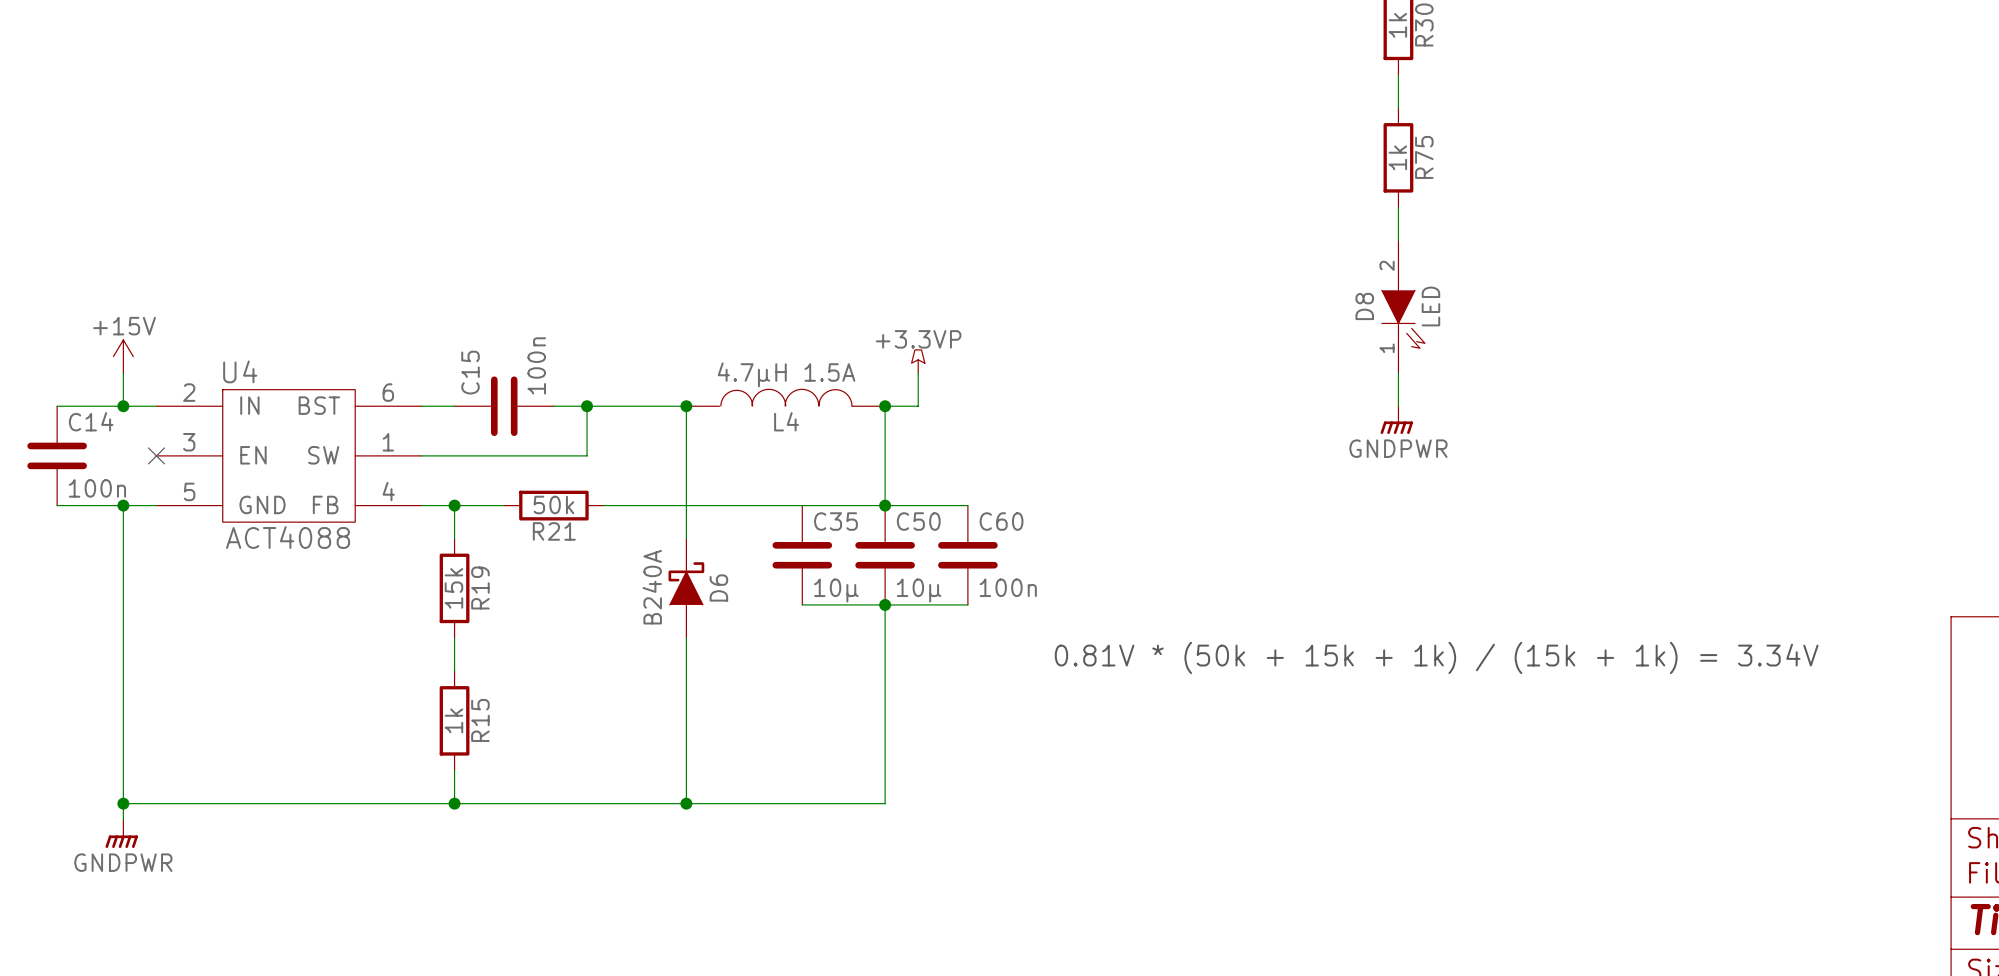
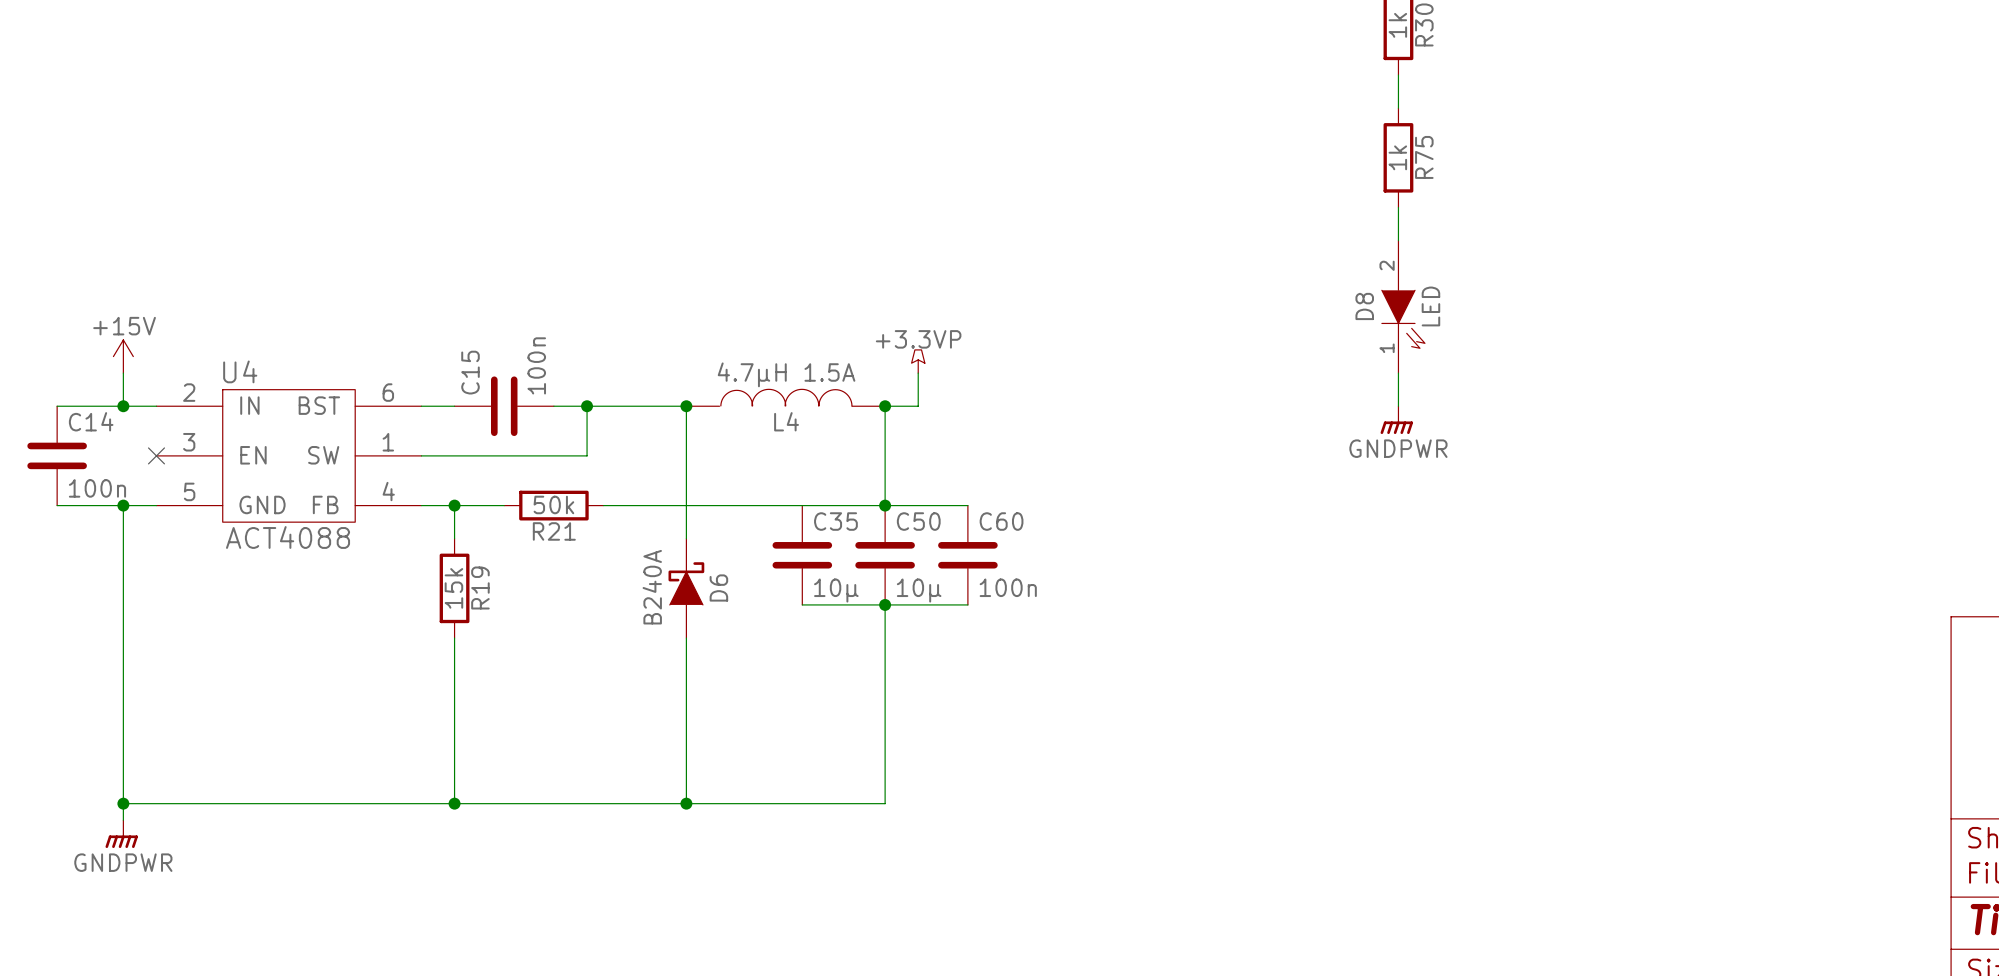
text: 0.81V * (50k + 15k + 1k) / (15k + 1k) = 3.34V (1436, 657) -> none
wire: none -> (454, 671) (454, 770)
R15: 1k (454, 720) -> none

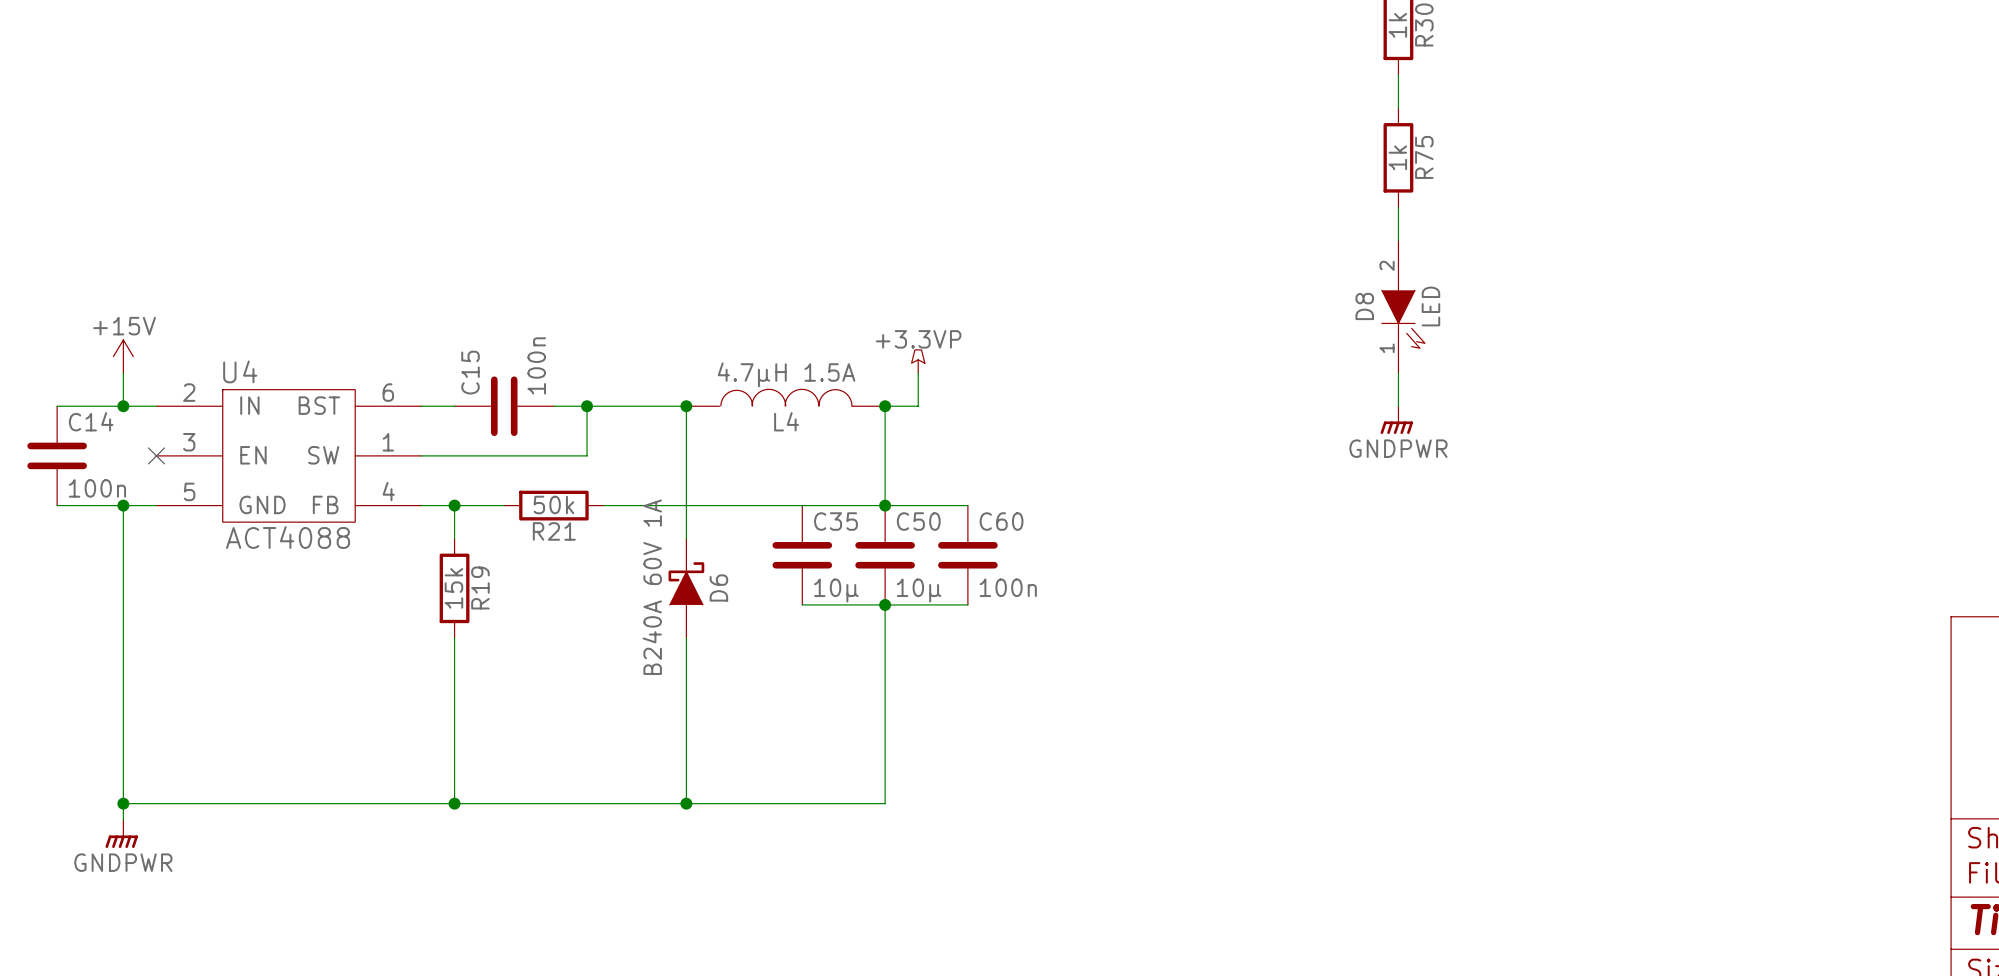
D6 value: B240A (652, 587) -> B240A 60V 1A (652, 587)

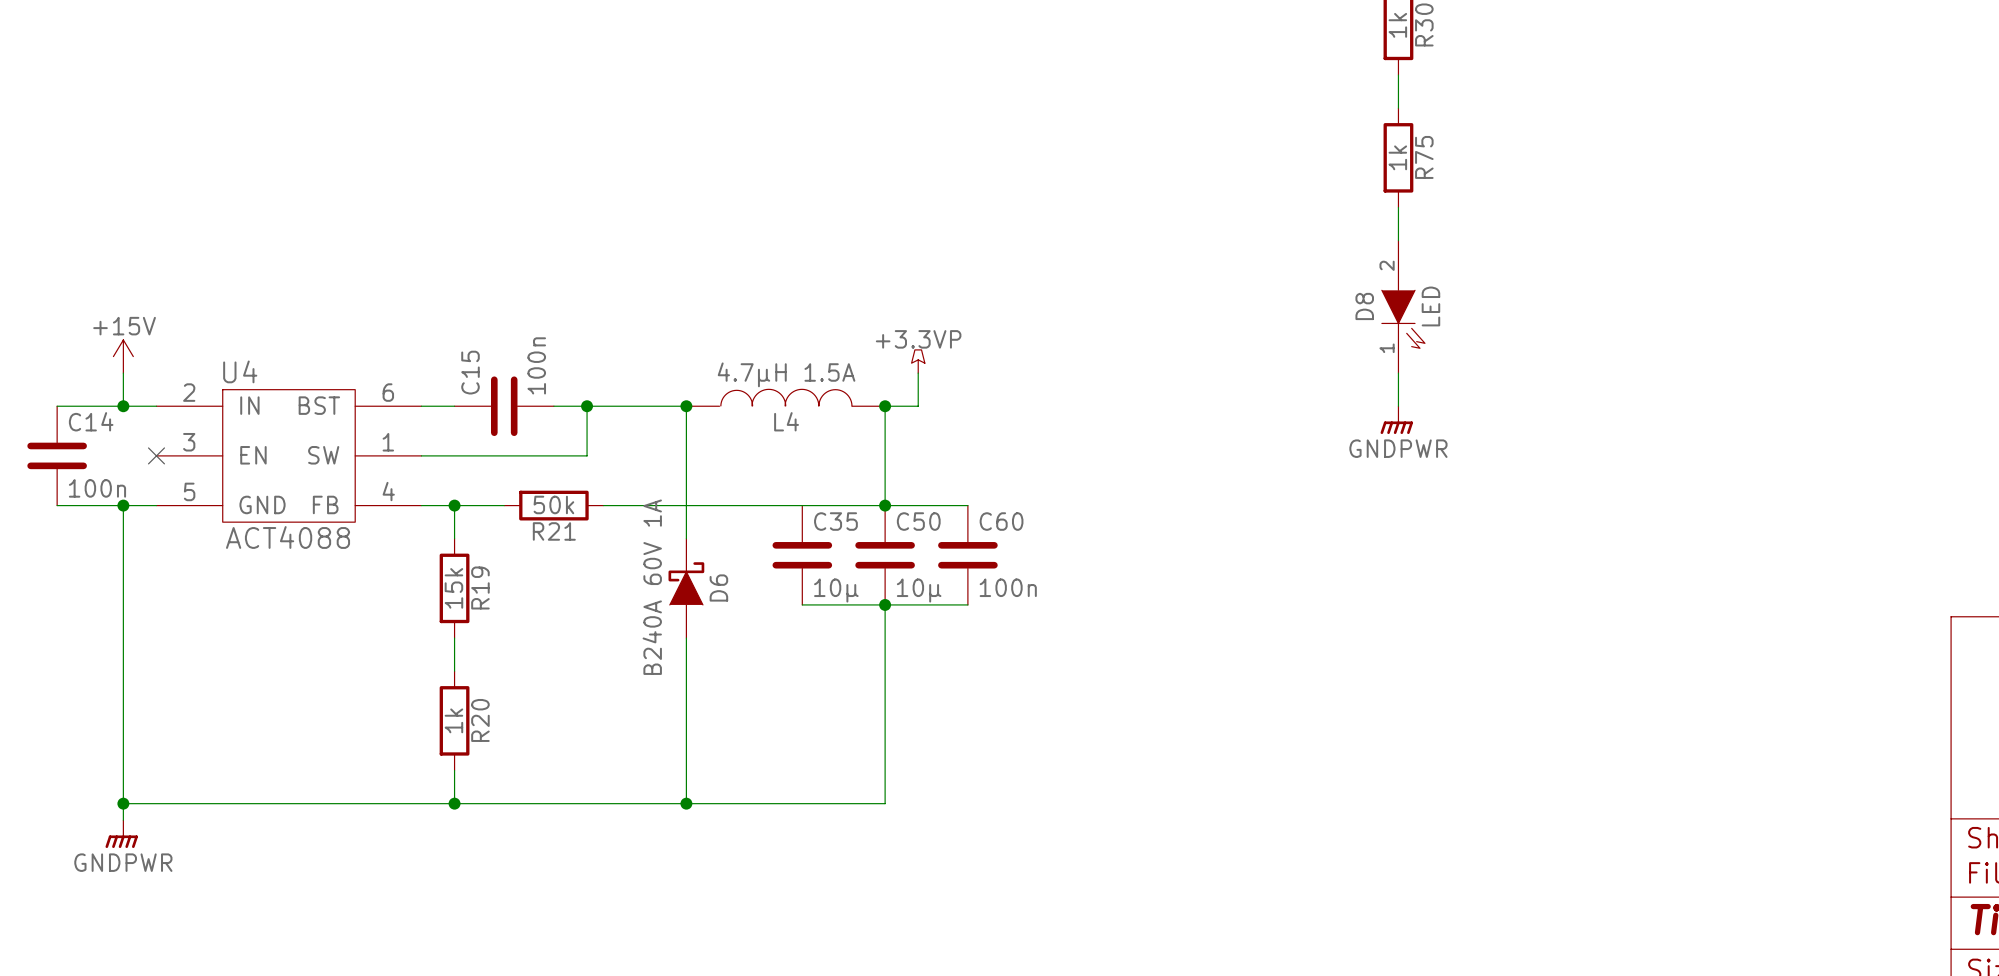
wire: (454, 671) (454, 770) -> none
R20: none -> 1k (454, 720)

